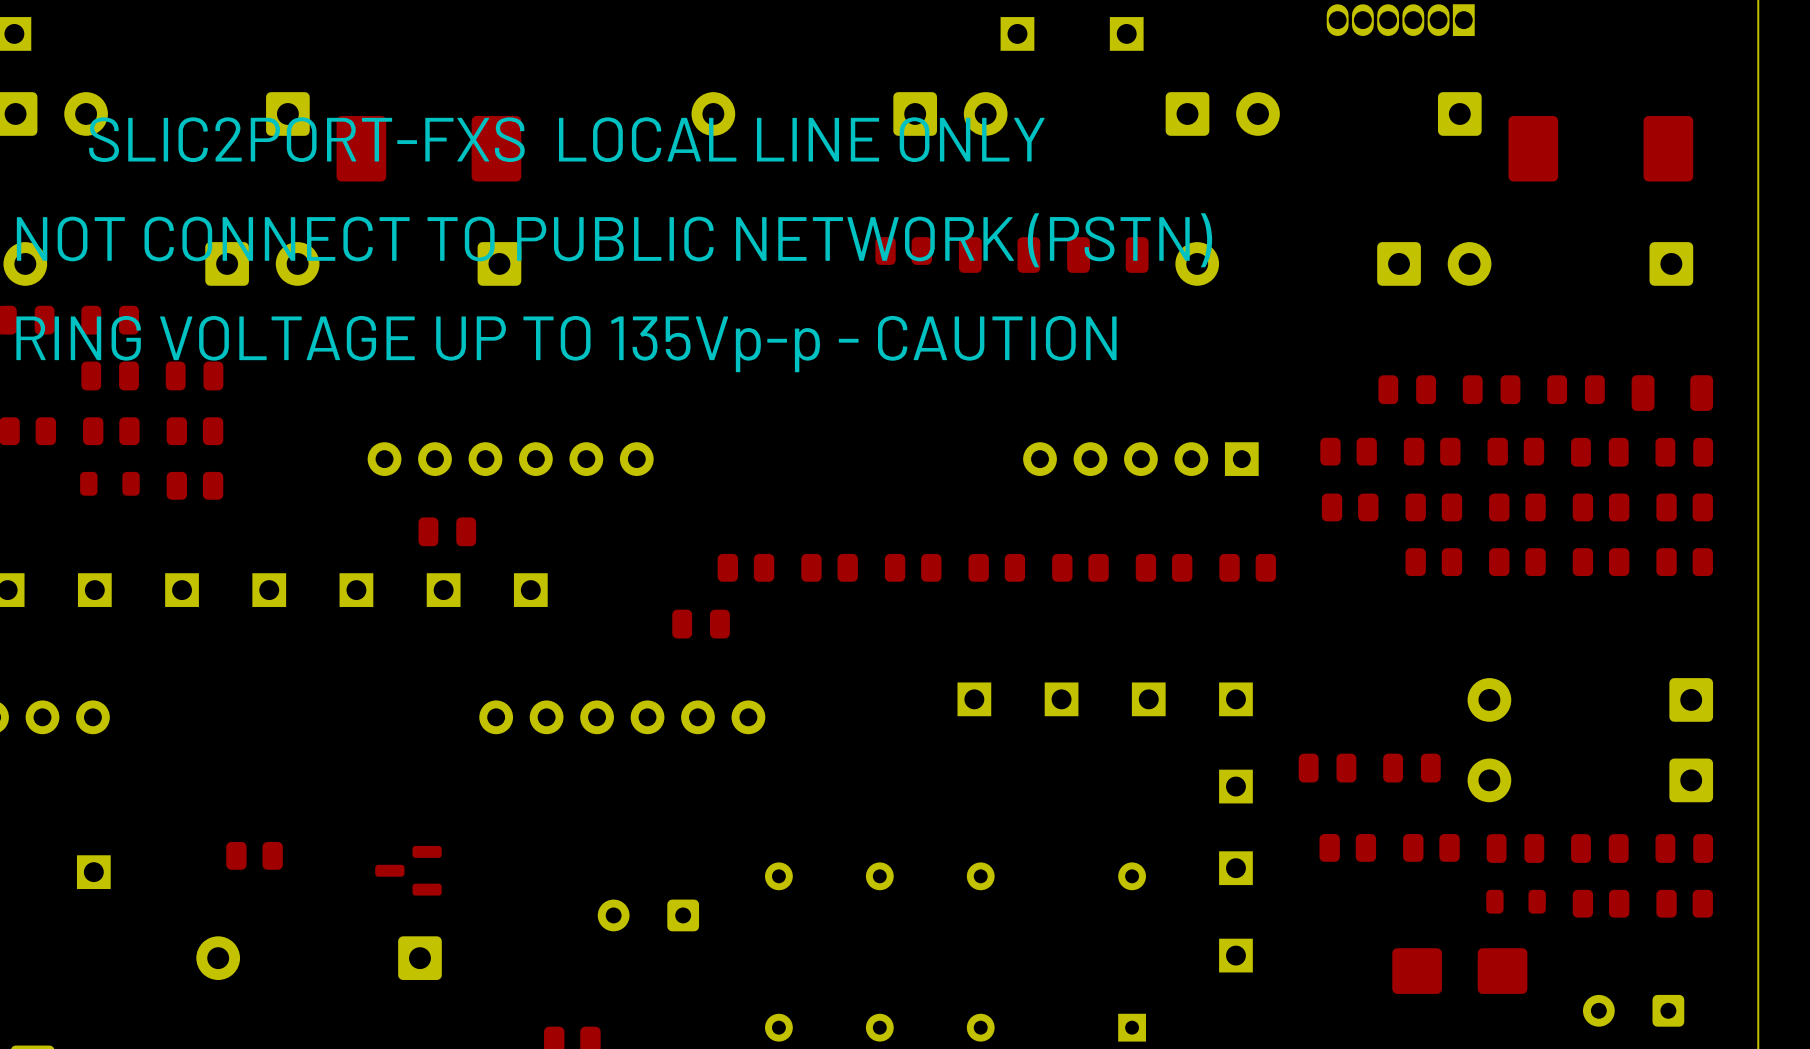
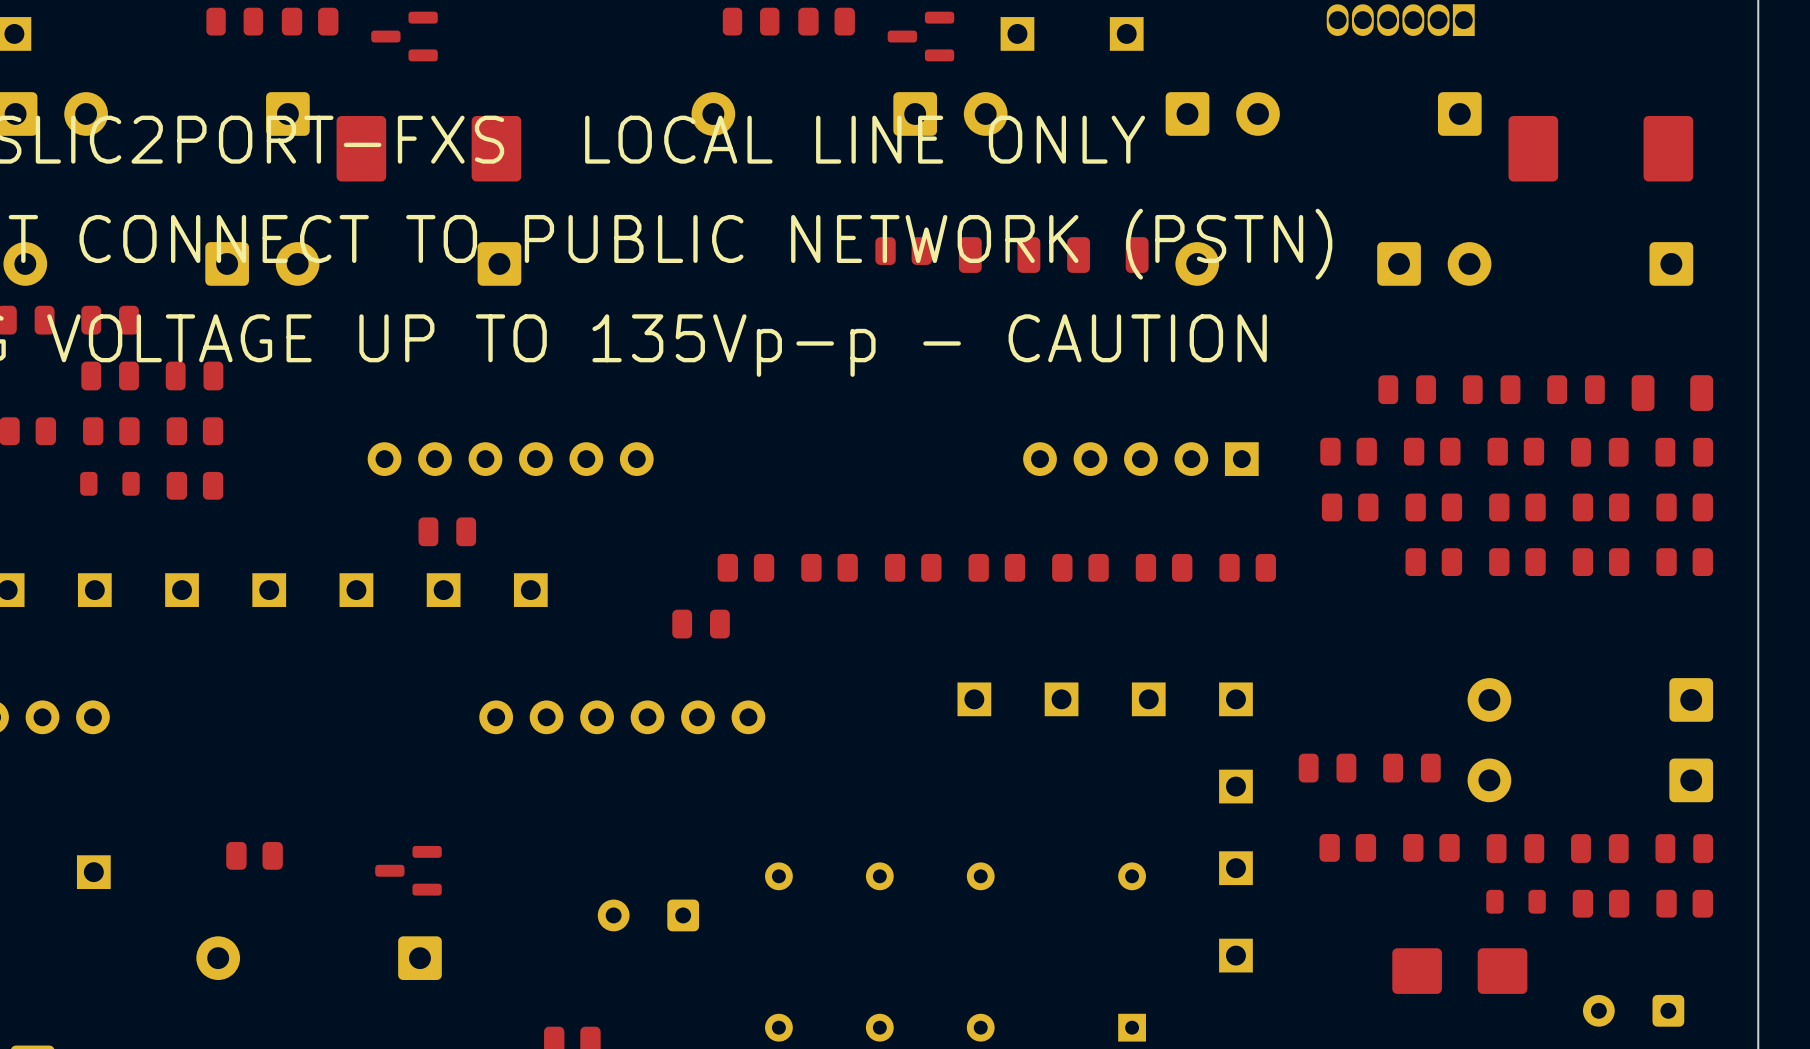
part: none -> (234, 21)
part: none -> (310, 21)
part: none -> (751, 21)
part: none -> (826, 21)
part: none -> (404, 36)
part: none -> (920, 36)

